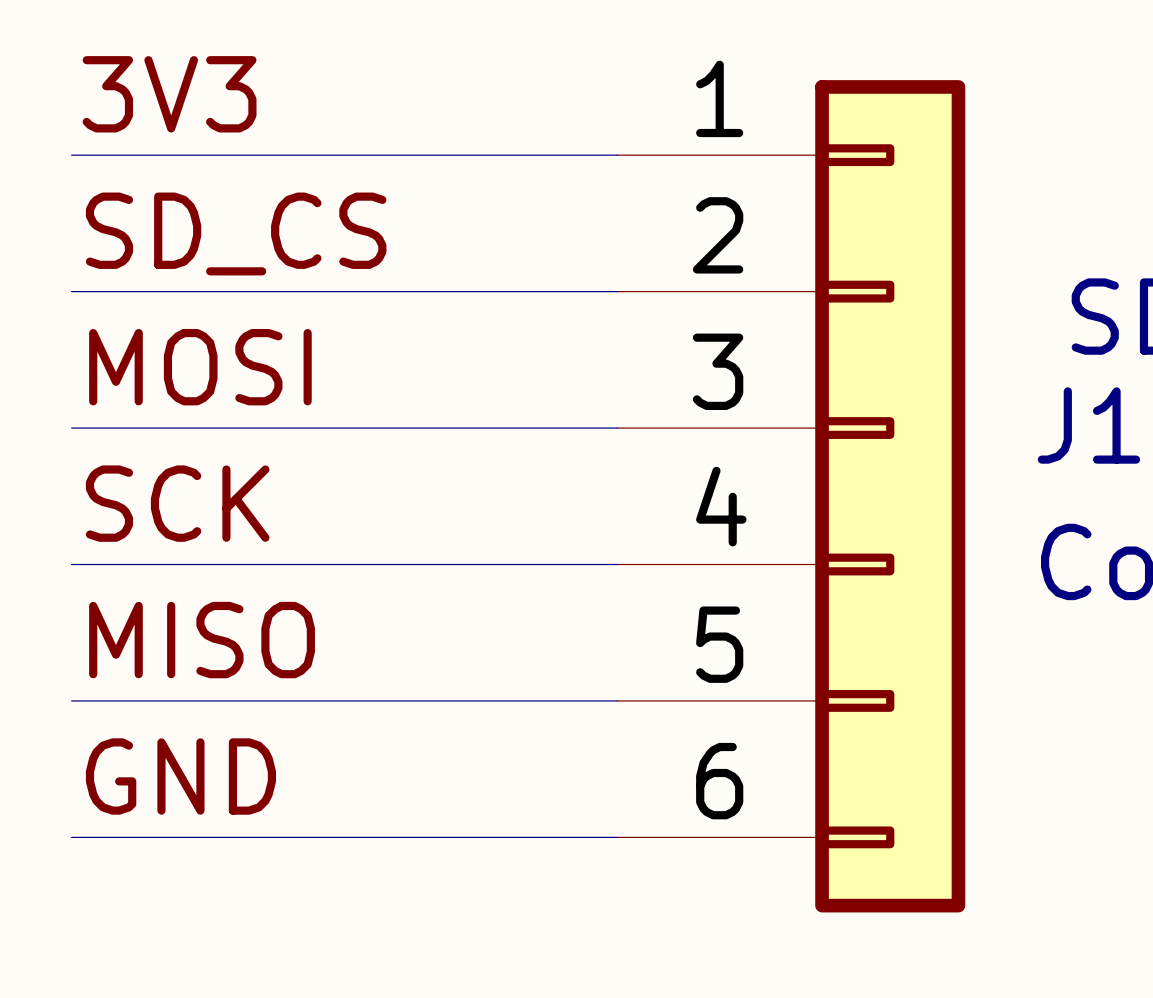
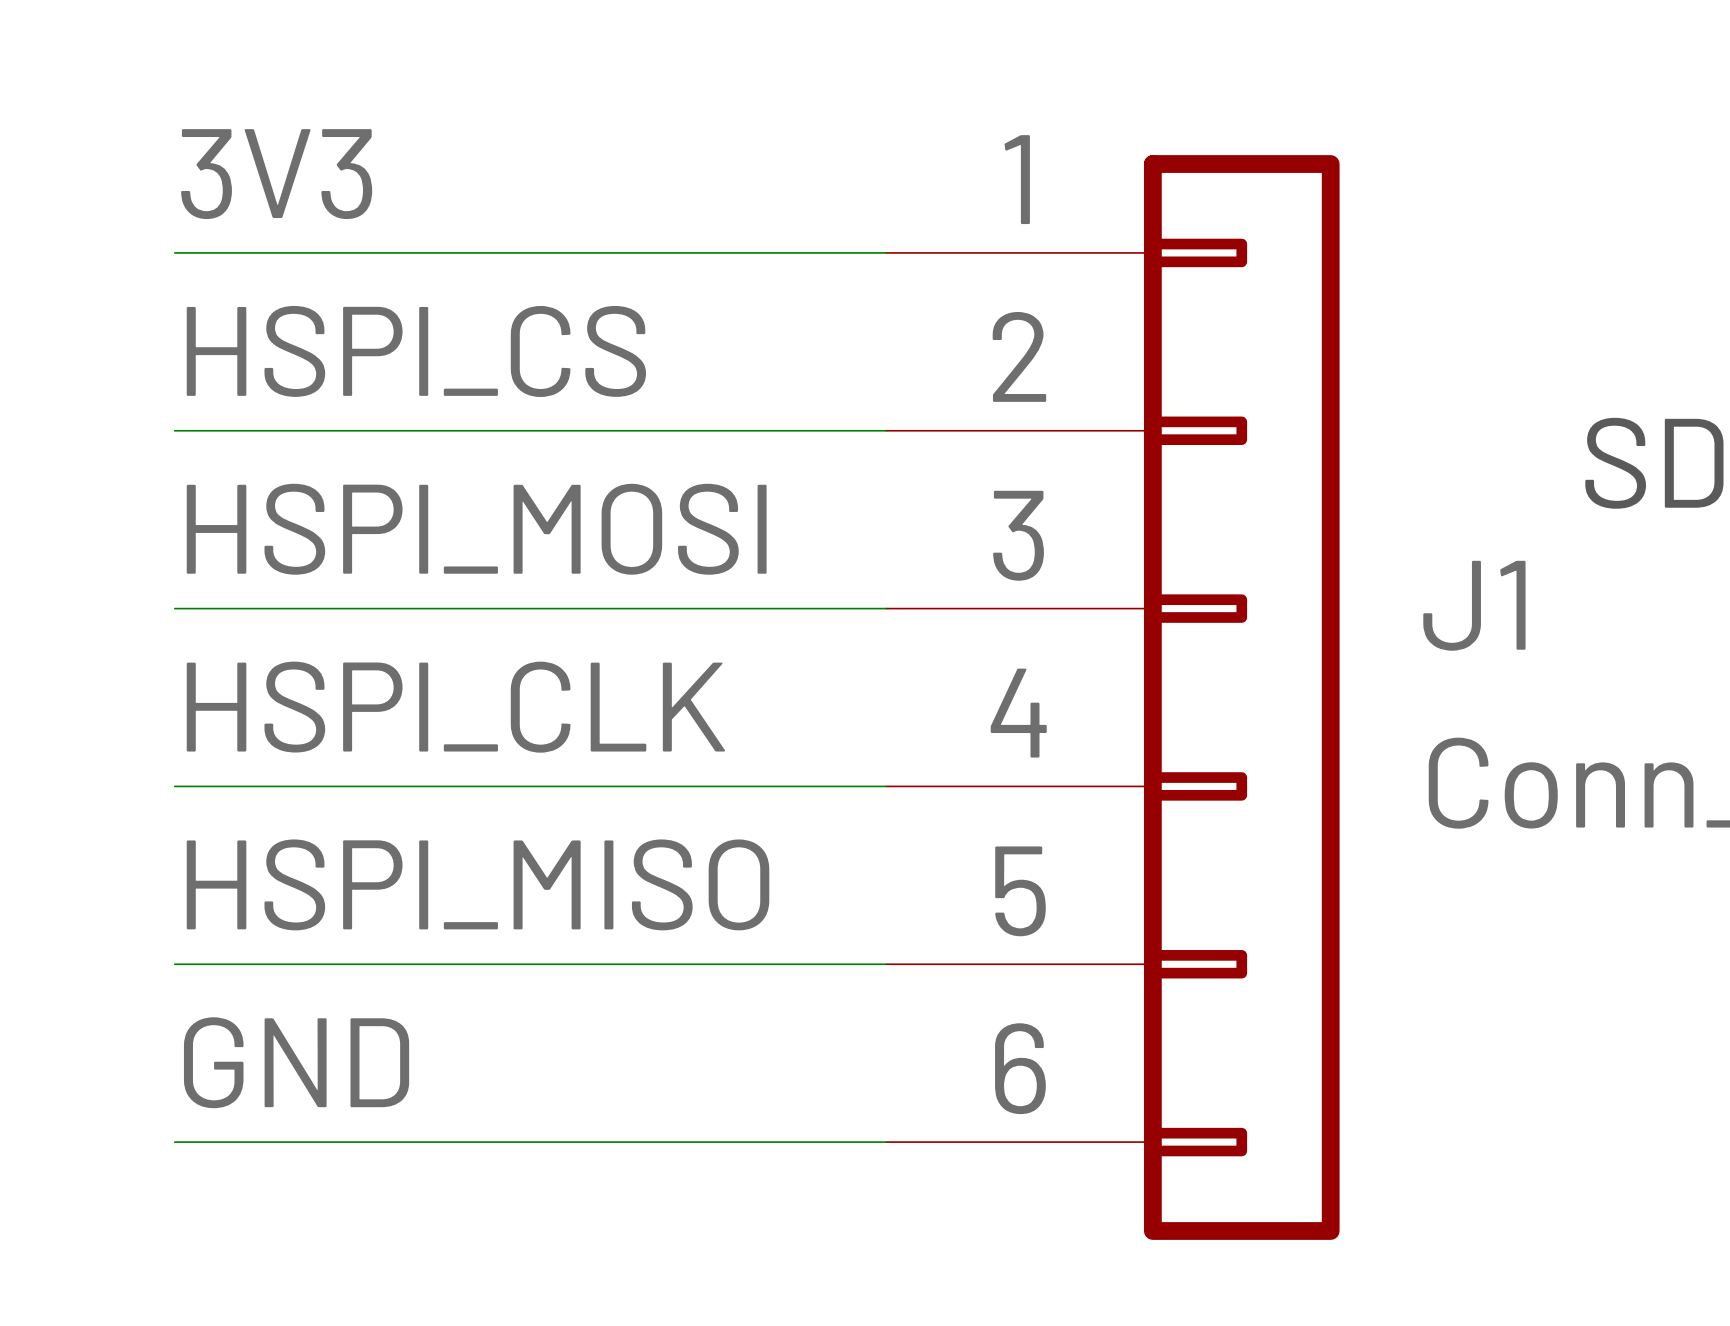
label: SD_CS (236, 233) -> HSPI_CS (416, 351)
label: MOSI (200, 367) -> HSPI_MOSI (476, 529)
label: SCK (177, 503) -> HSPI_CLK (455, 707)
label: MISO (202, 640) -> HSPI_MISO (478, 884)

